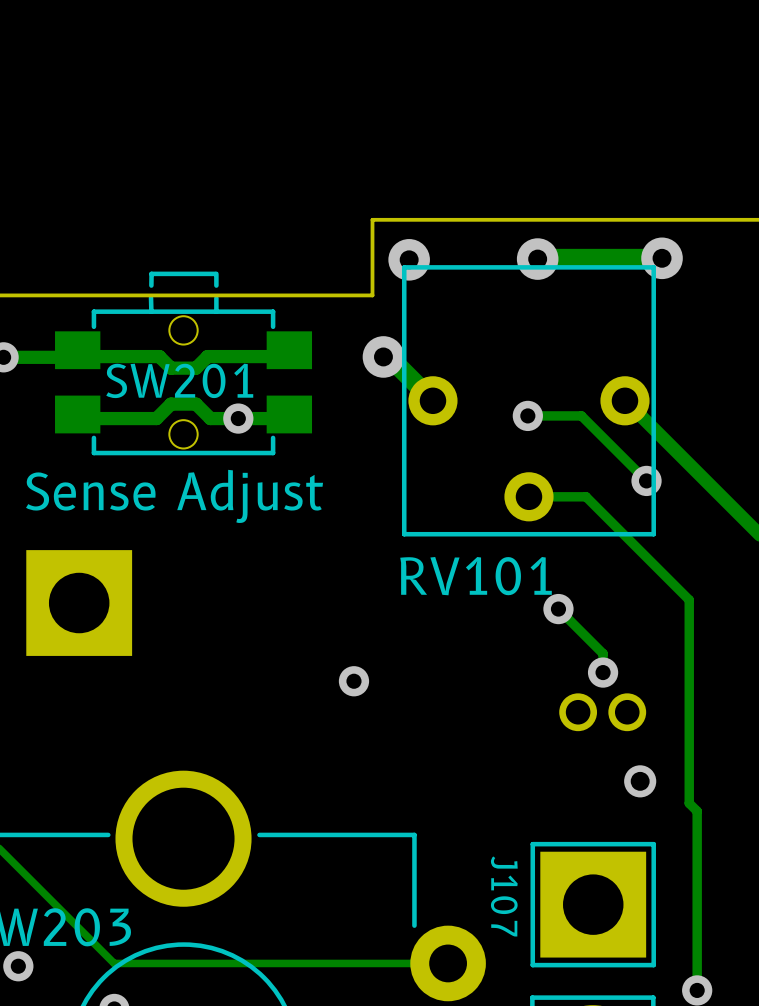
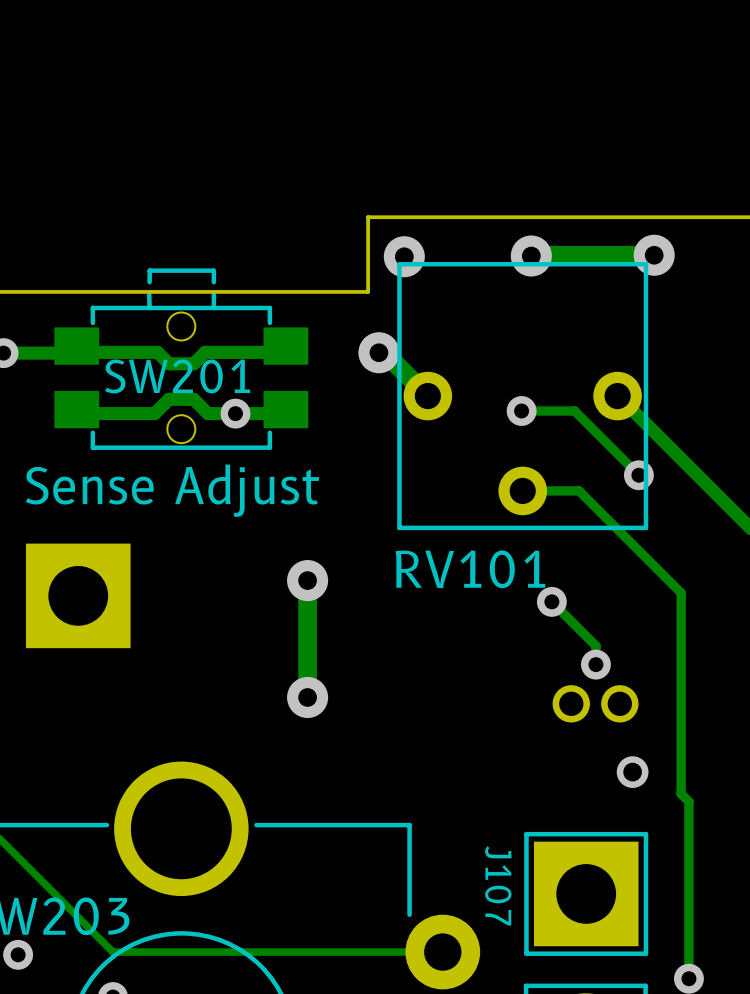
track: none -> (307, 580) (307, 697)
via: none -> (307, 580)
via: (353, 681) -> none
via: none -> (307, 697)

